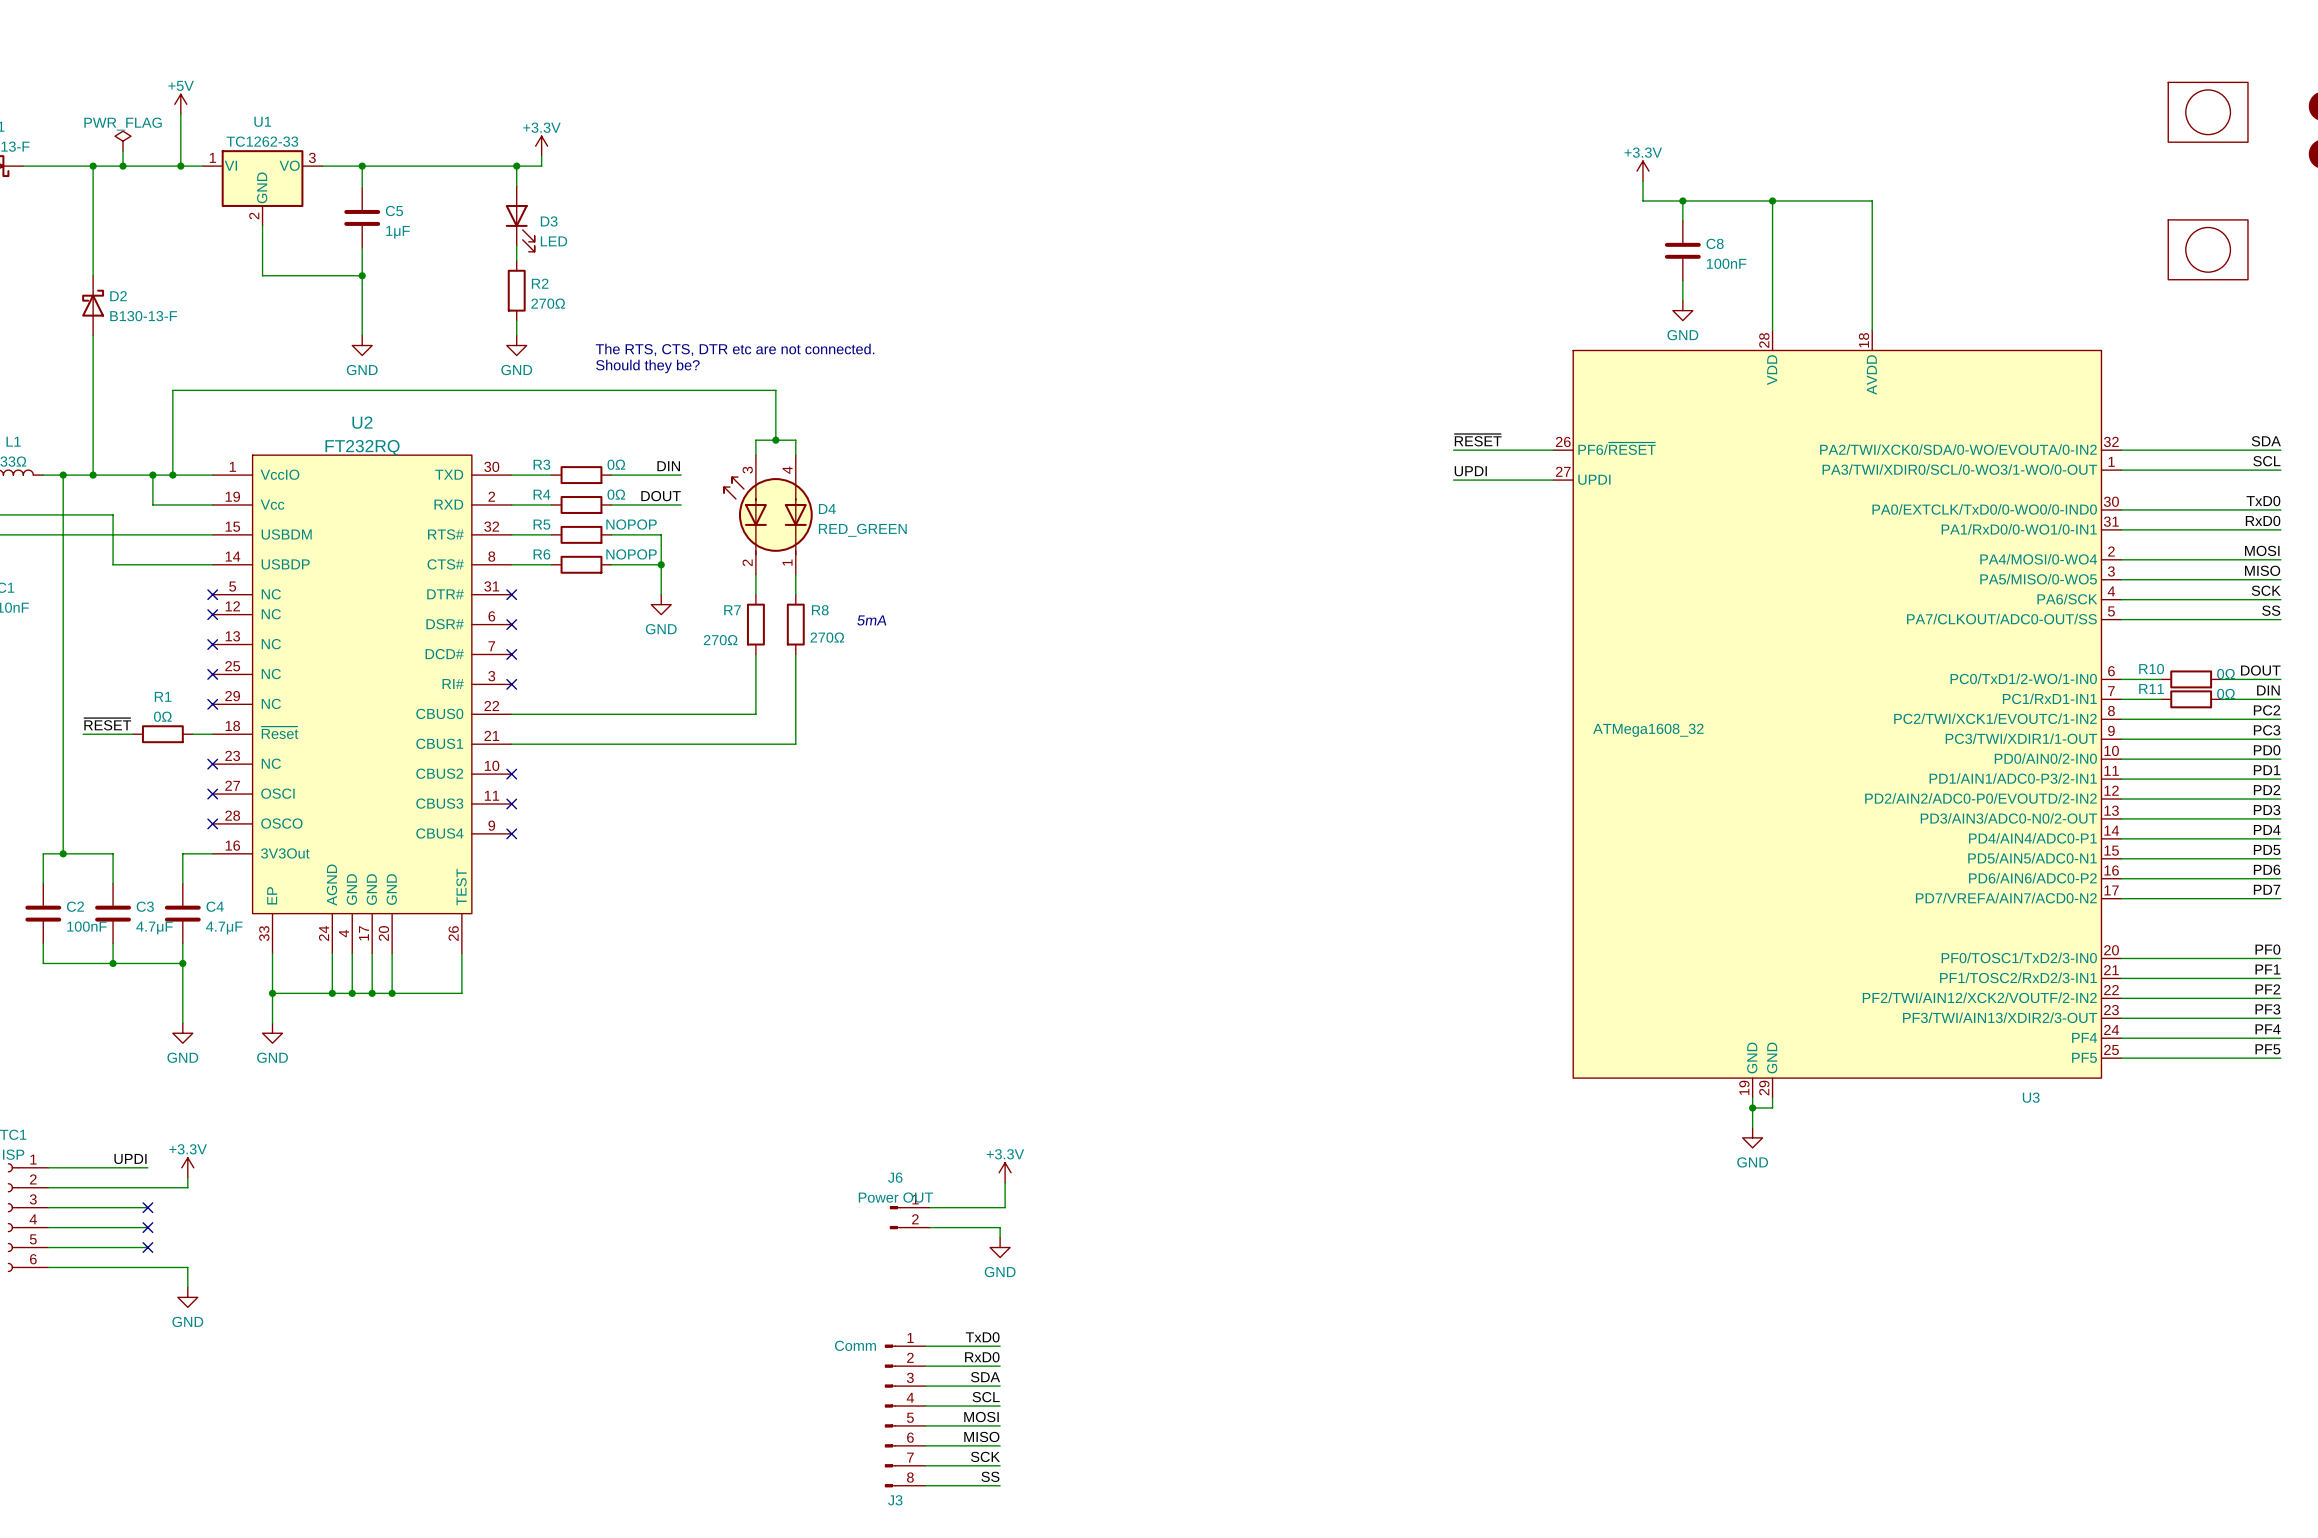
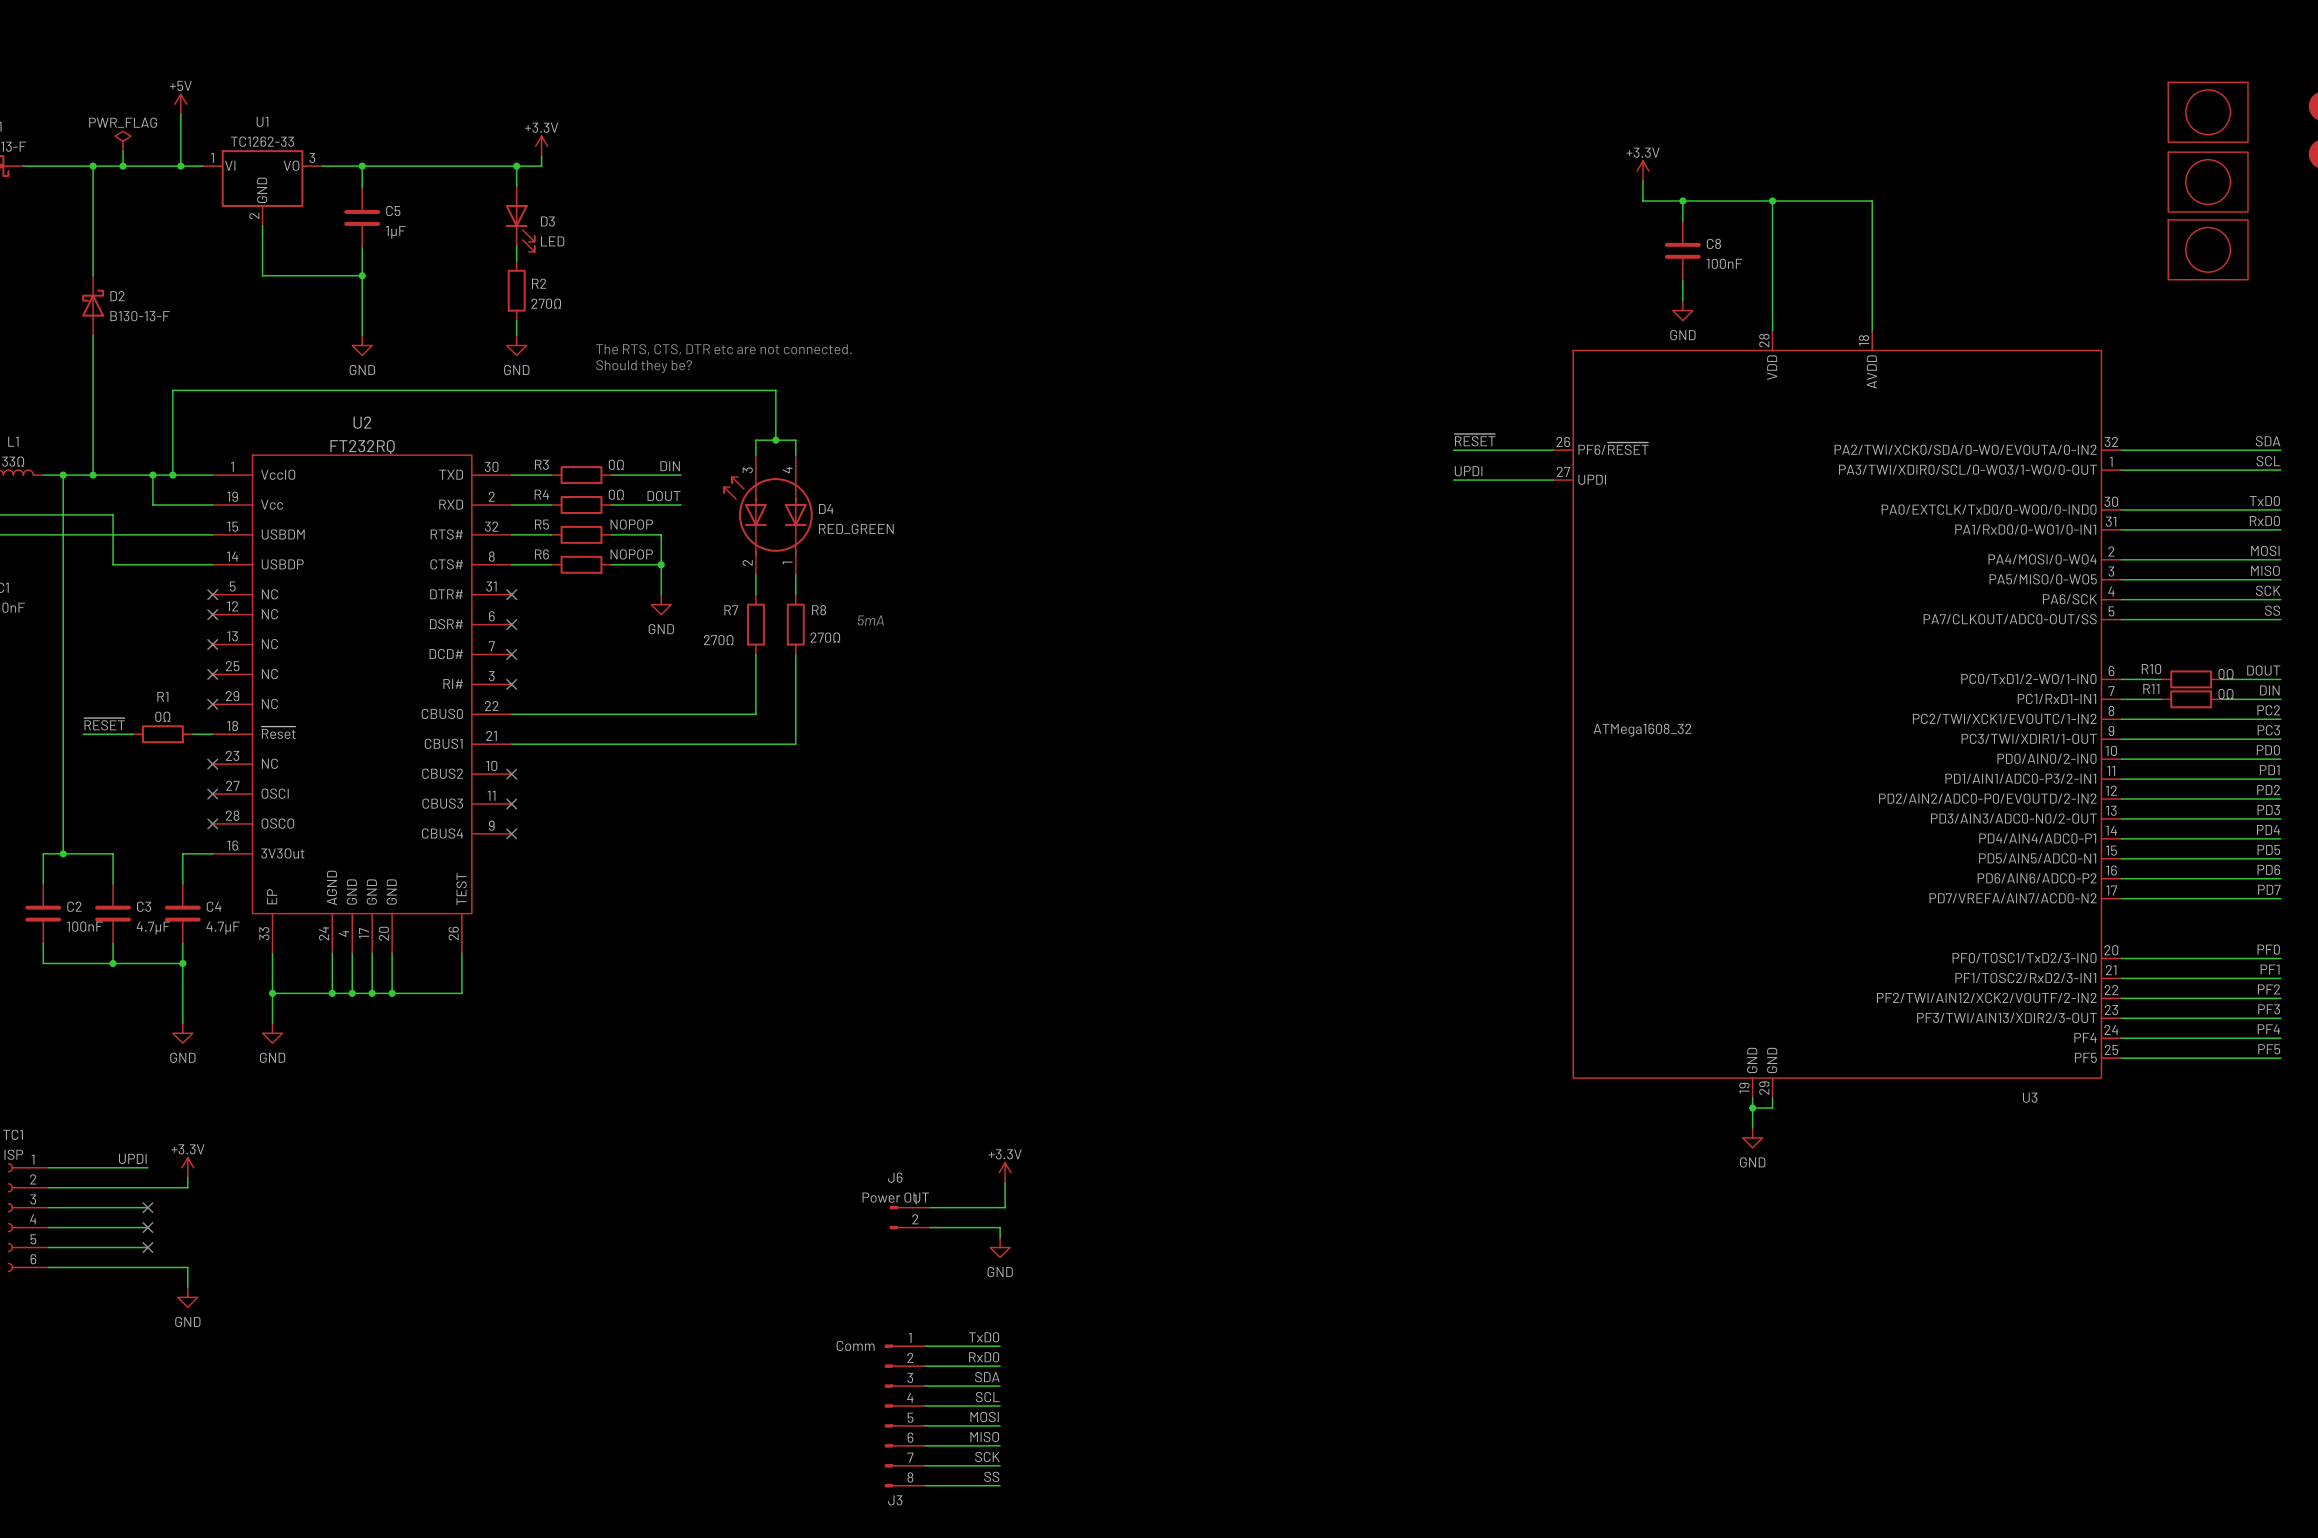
part: none -> (2208, 182)

